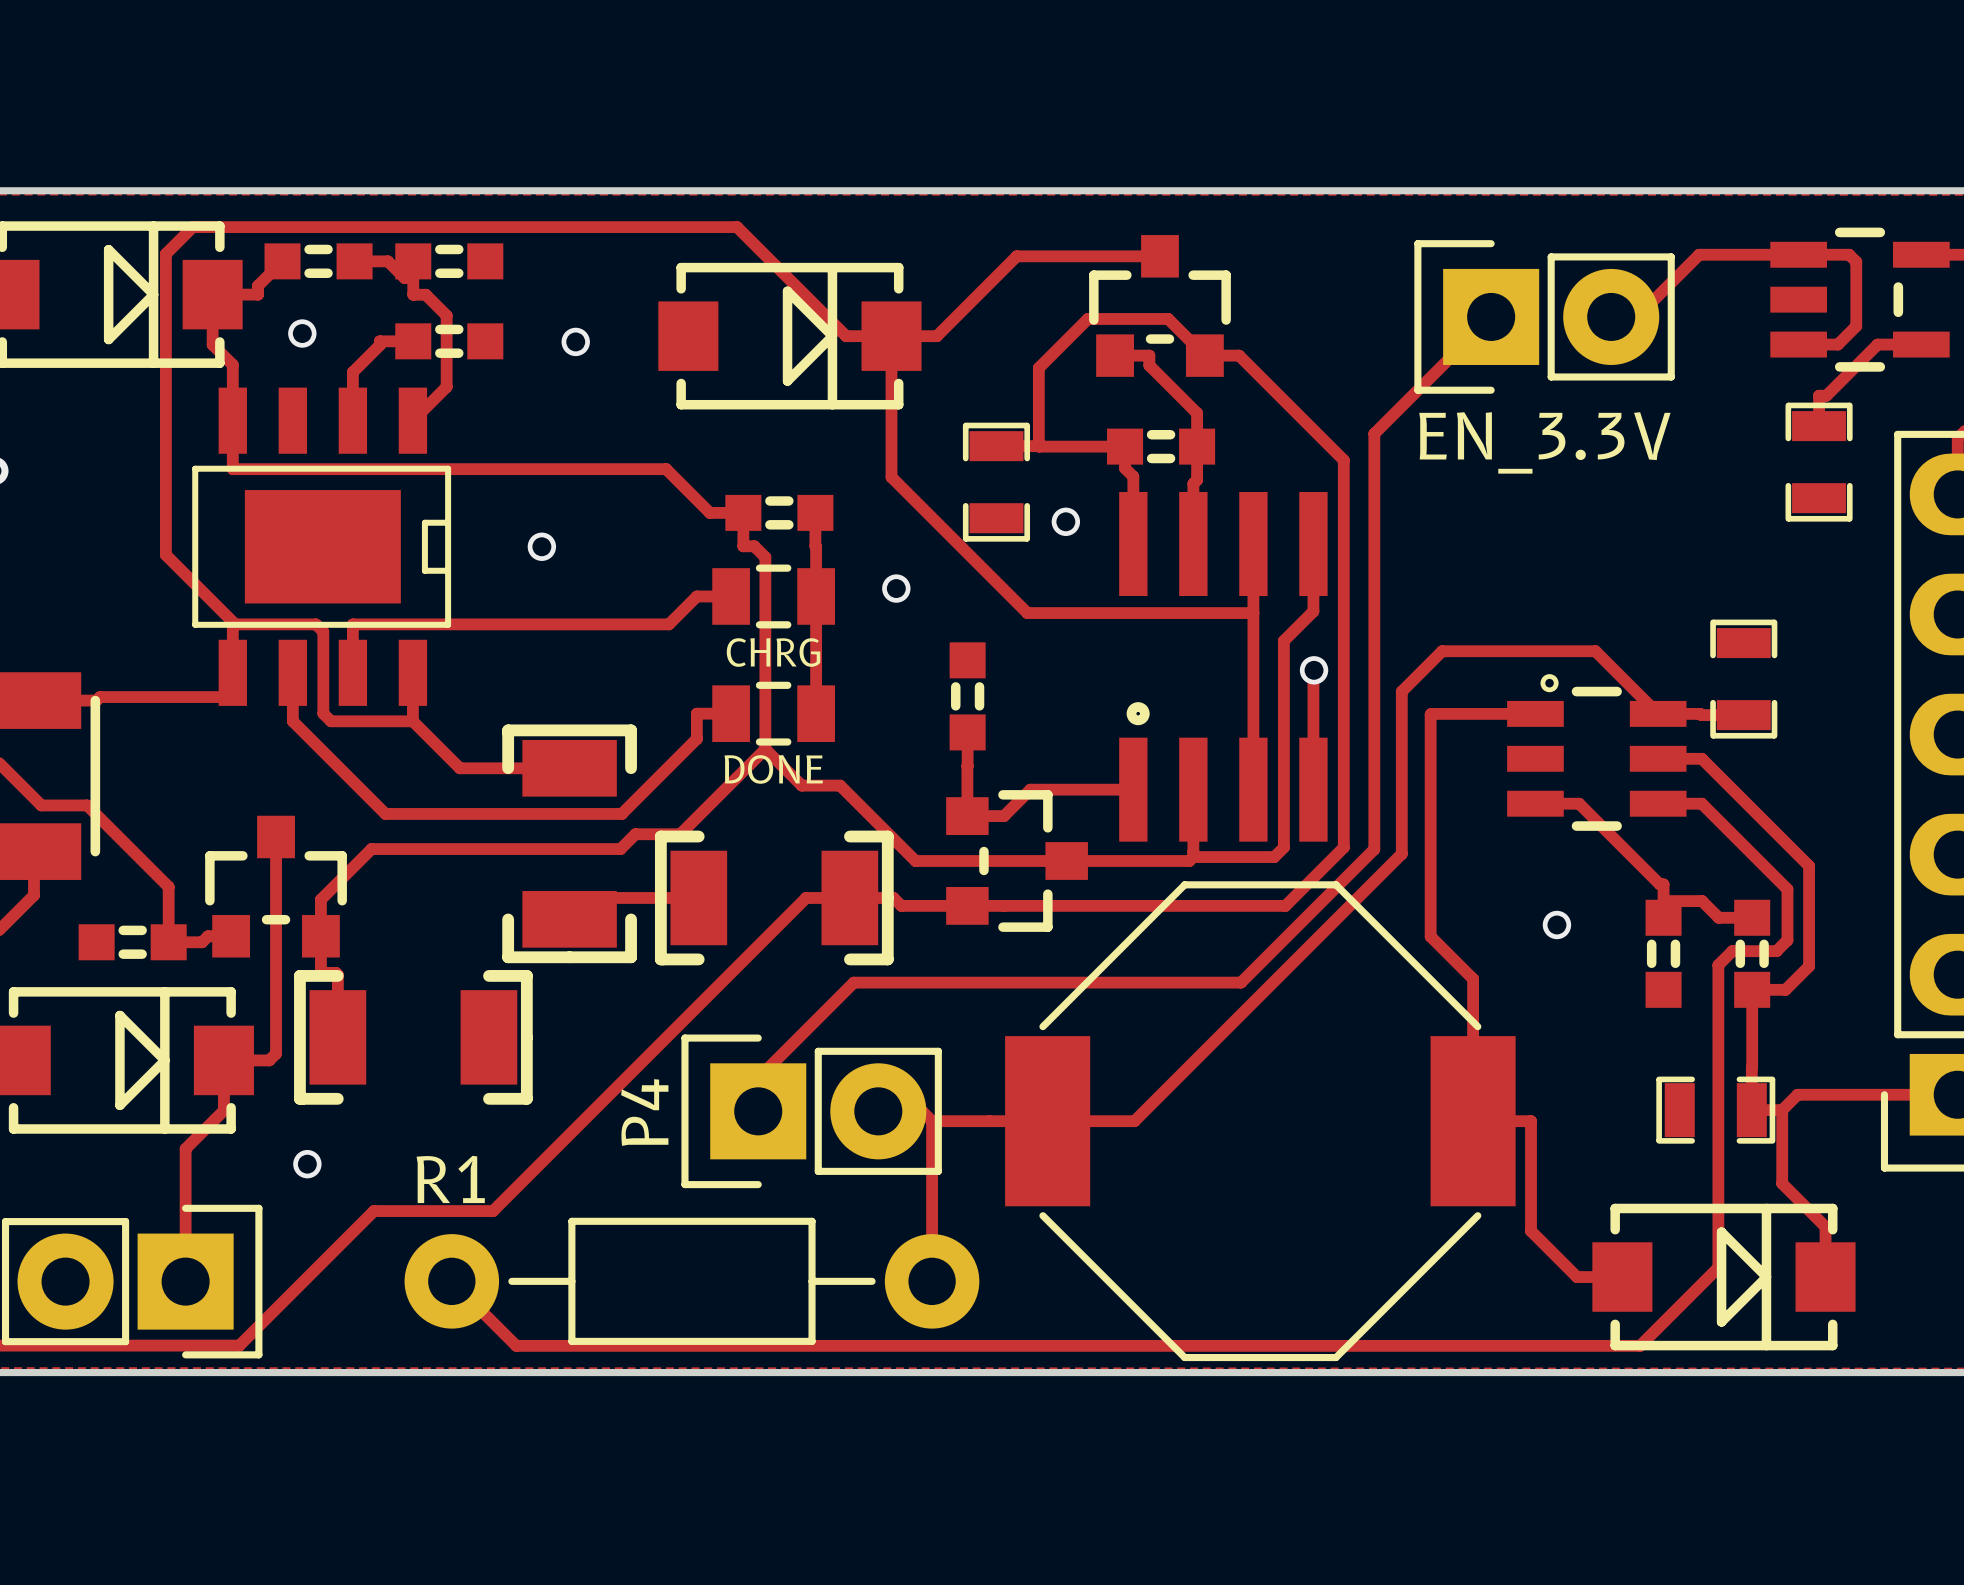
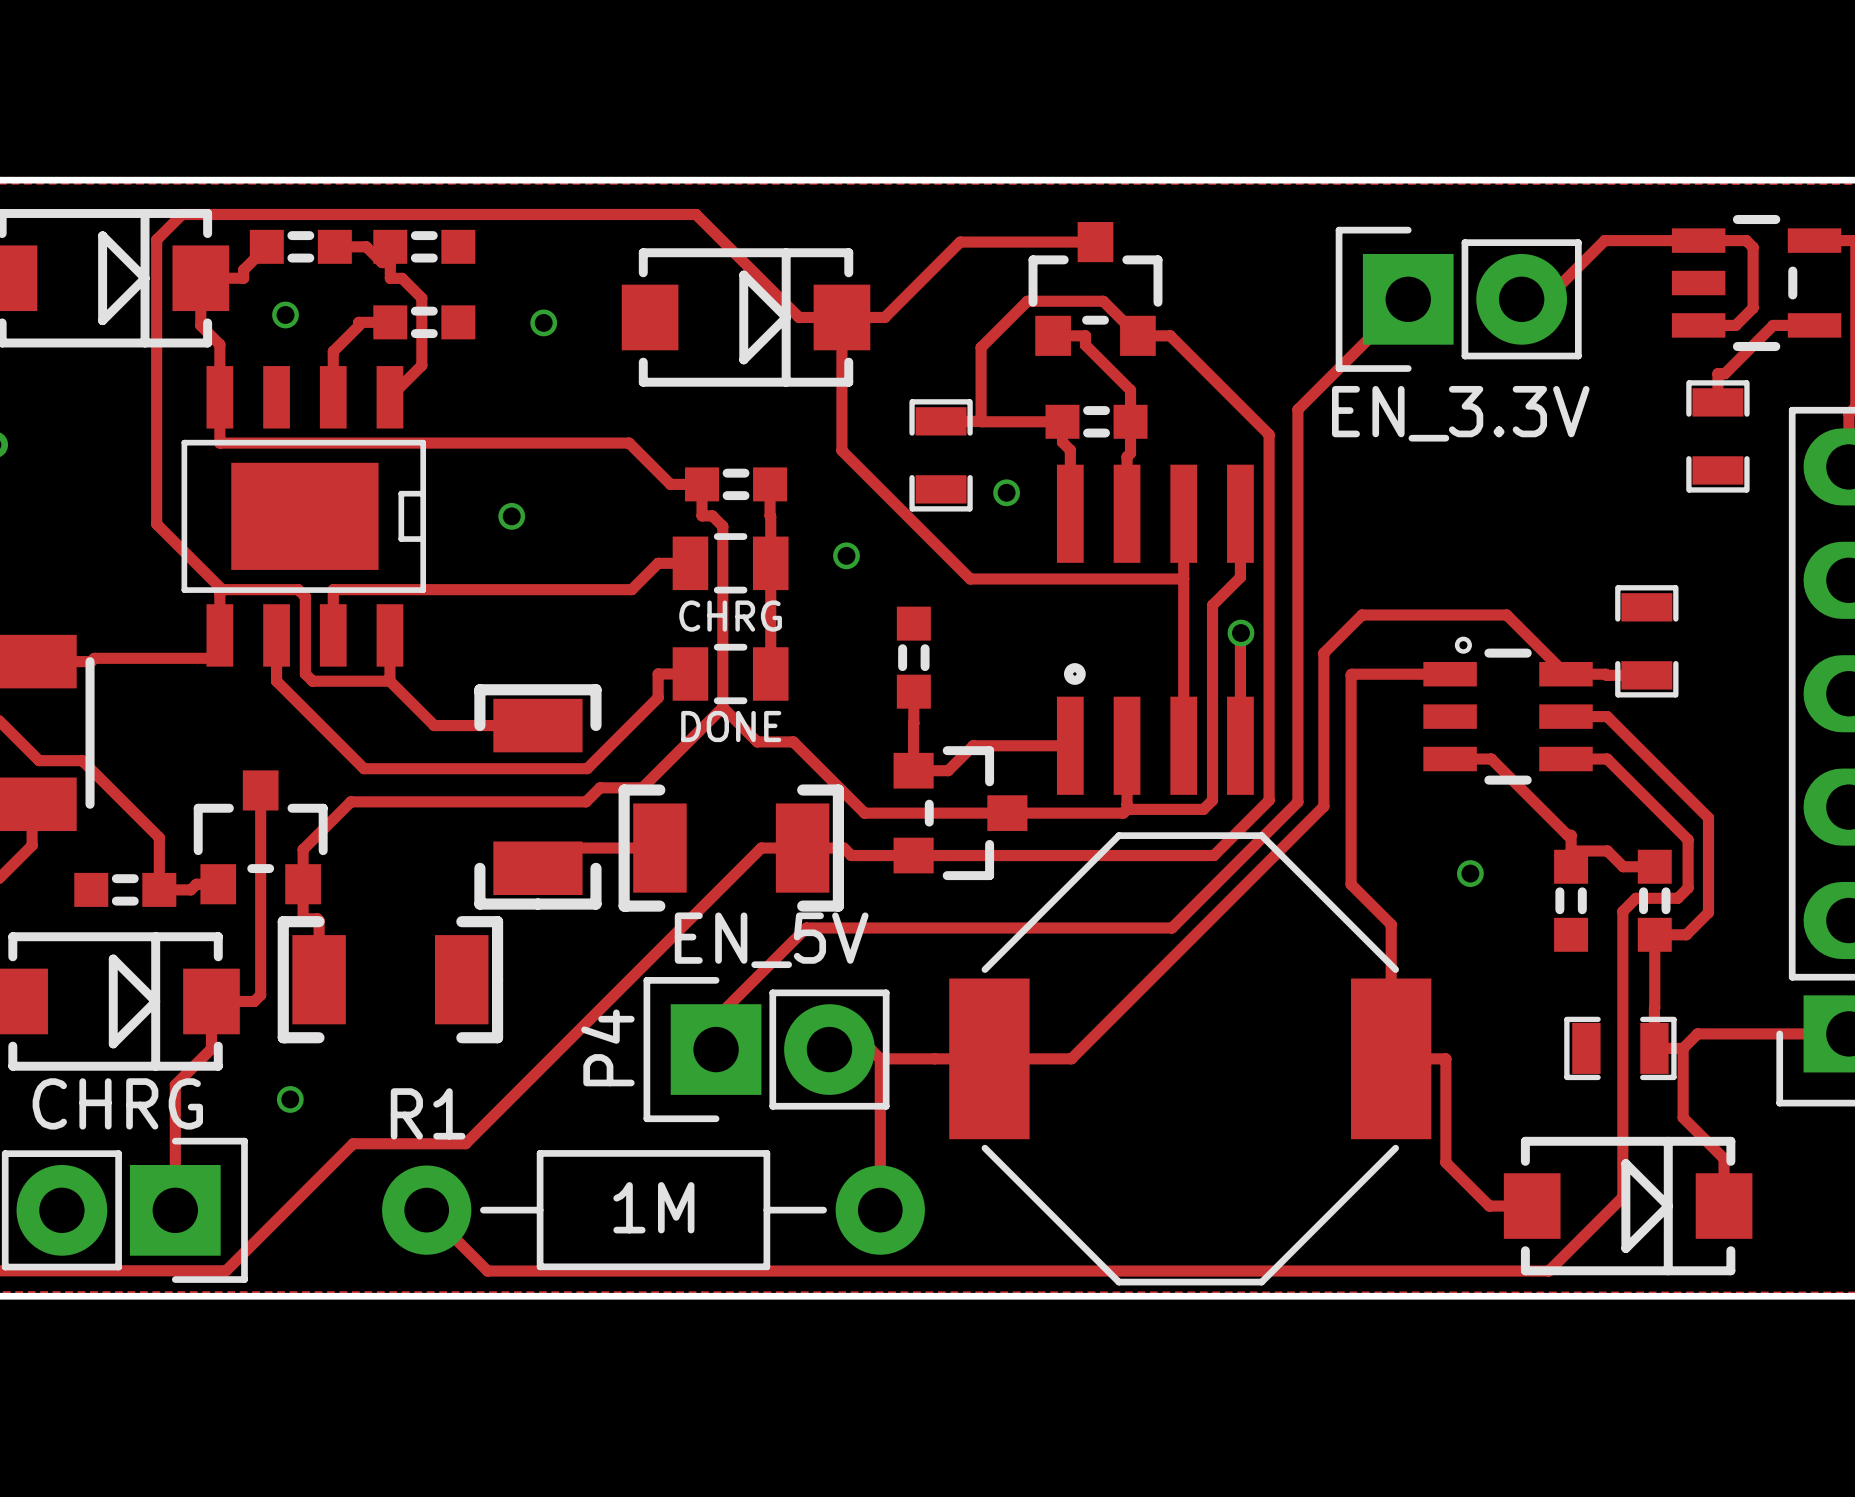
P4 value: none -> EN_5V (771, 940)
part value: none -> CHRG (117, 1103)
R1 value: none -> 1M (653, 1207)

